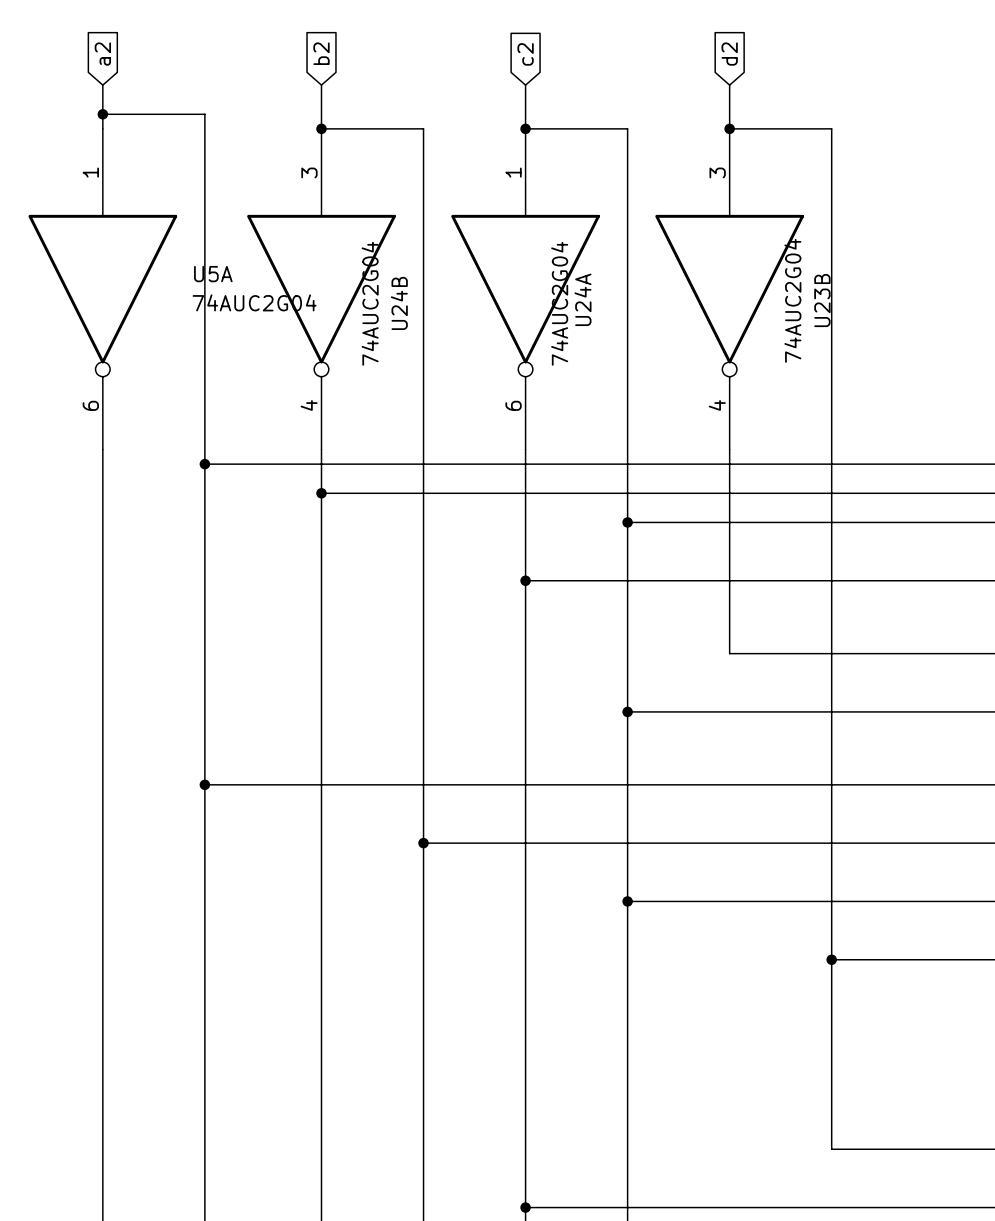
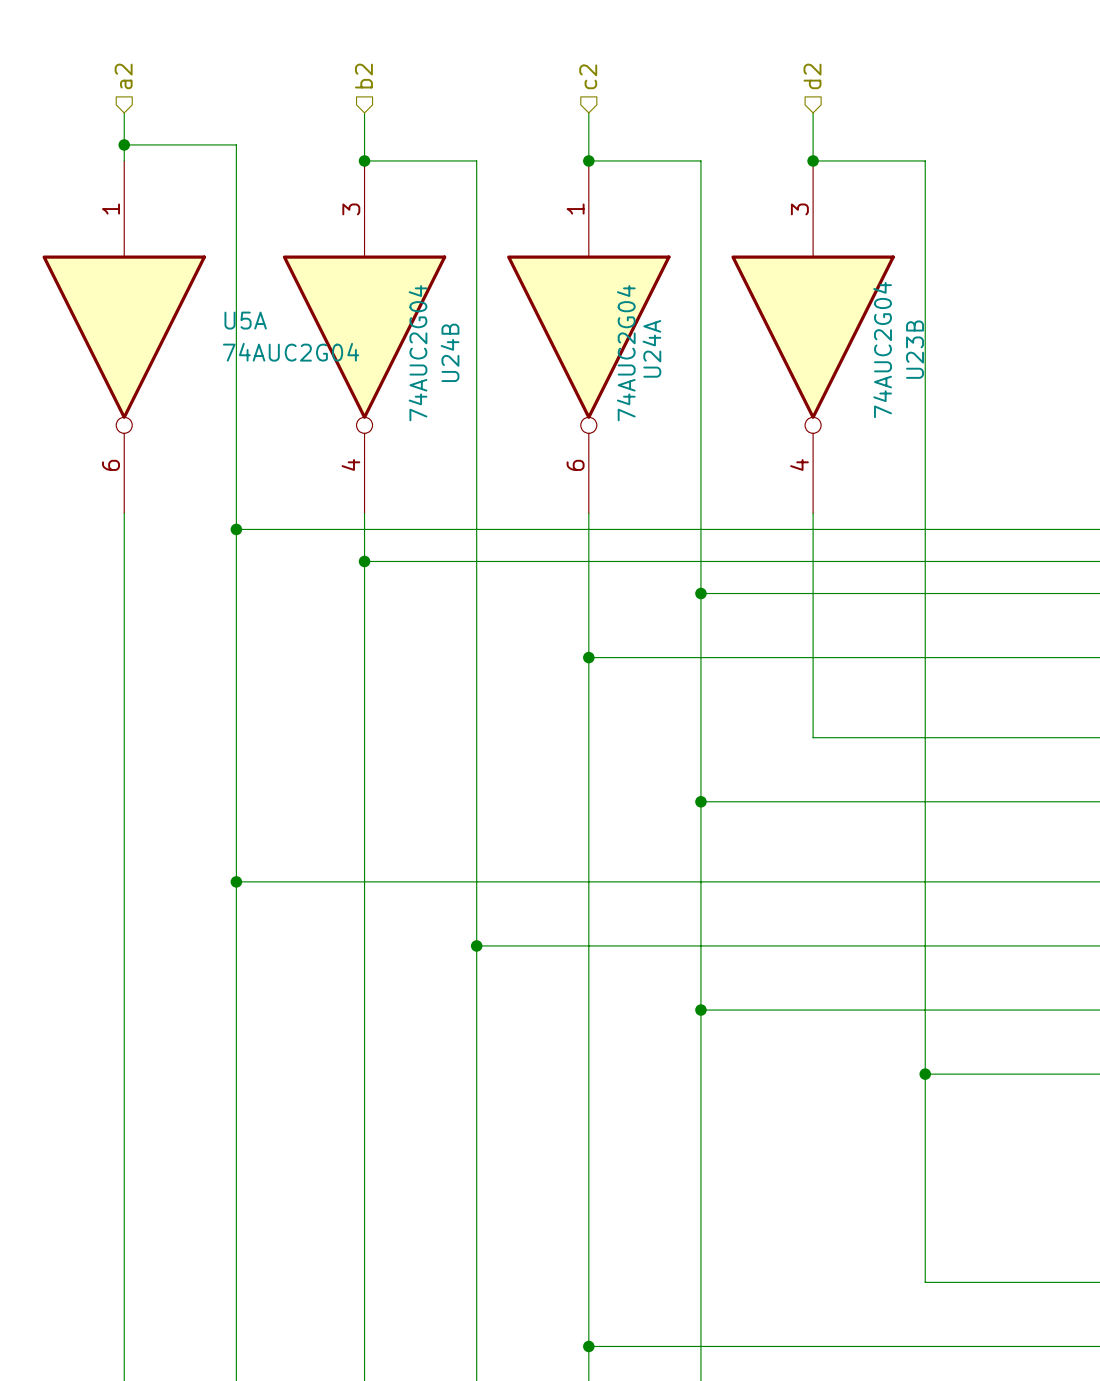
hierarchical label: none -> a2 (123, 76)
hierarchical label: none -> b2 (363, 76)
hierarchical label: none -> d2 (812, 76)
hierarchical label: none -> c2 (588, 76)
global label: b2 (321, 53) -> none
global label: a2 (102, 54) -> none
global label: c2 (525, 54) -> none
global label: d2 (729, 54) -> none

